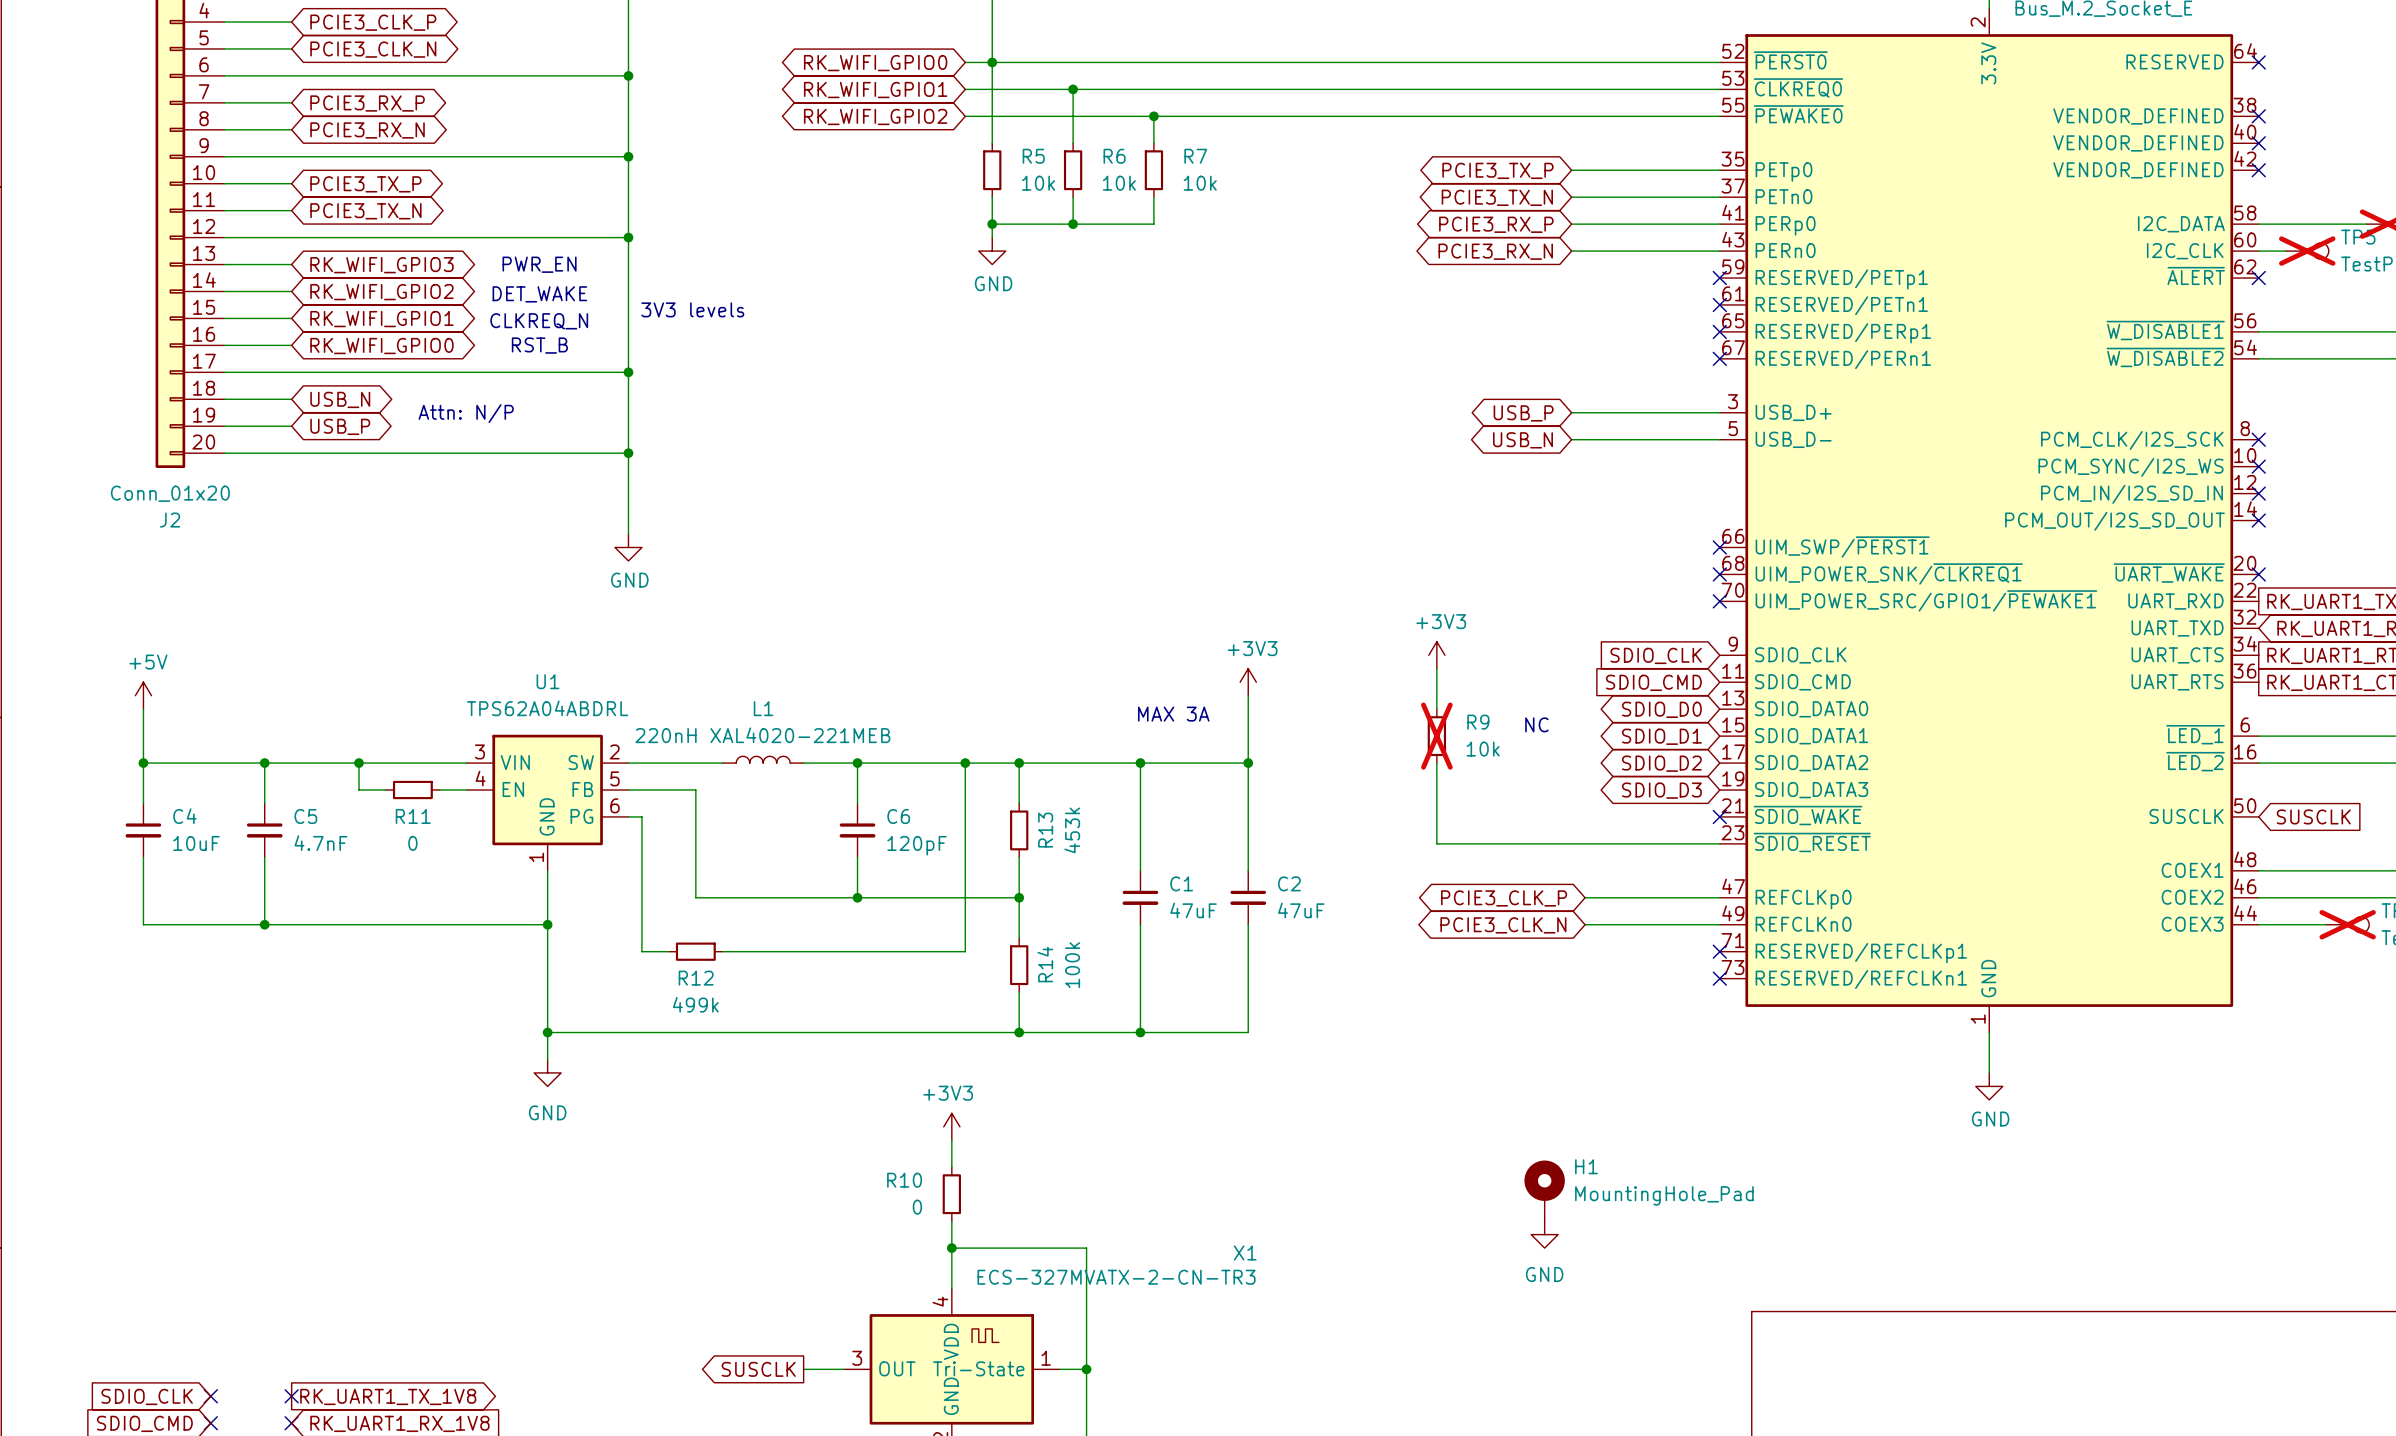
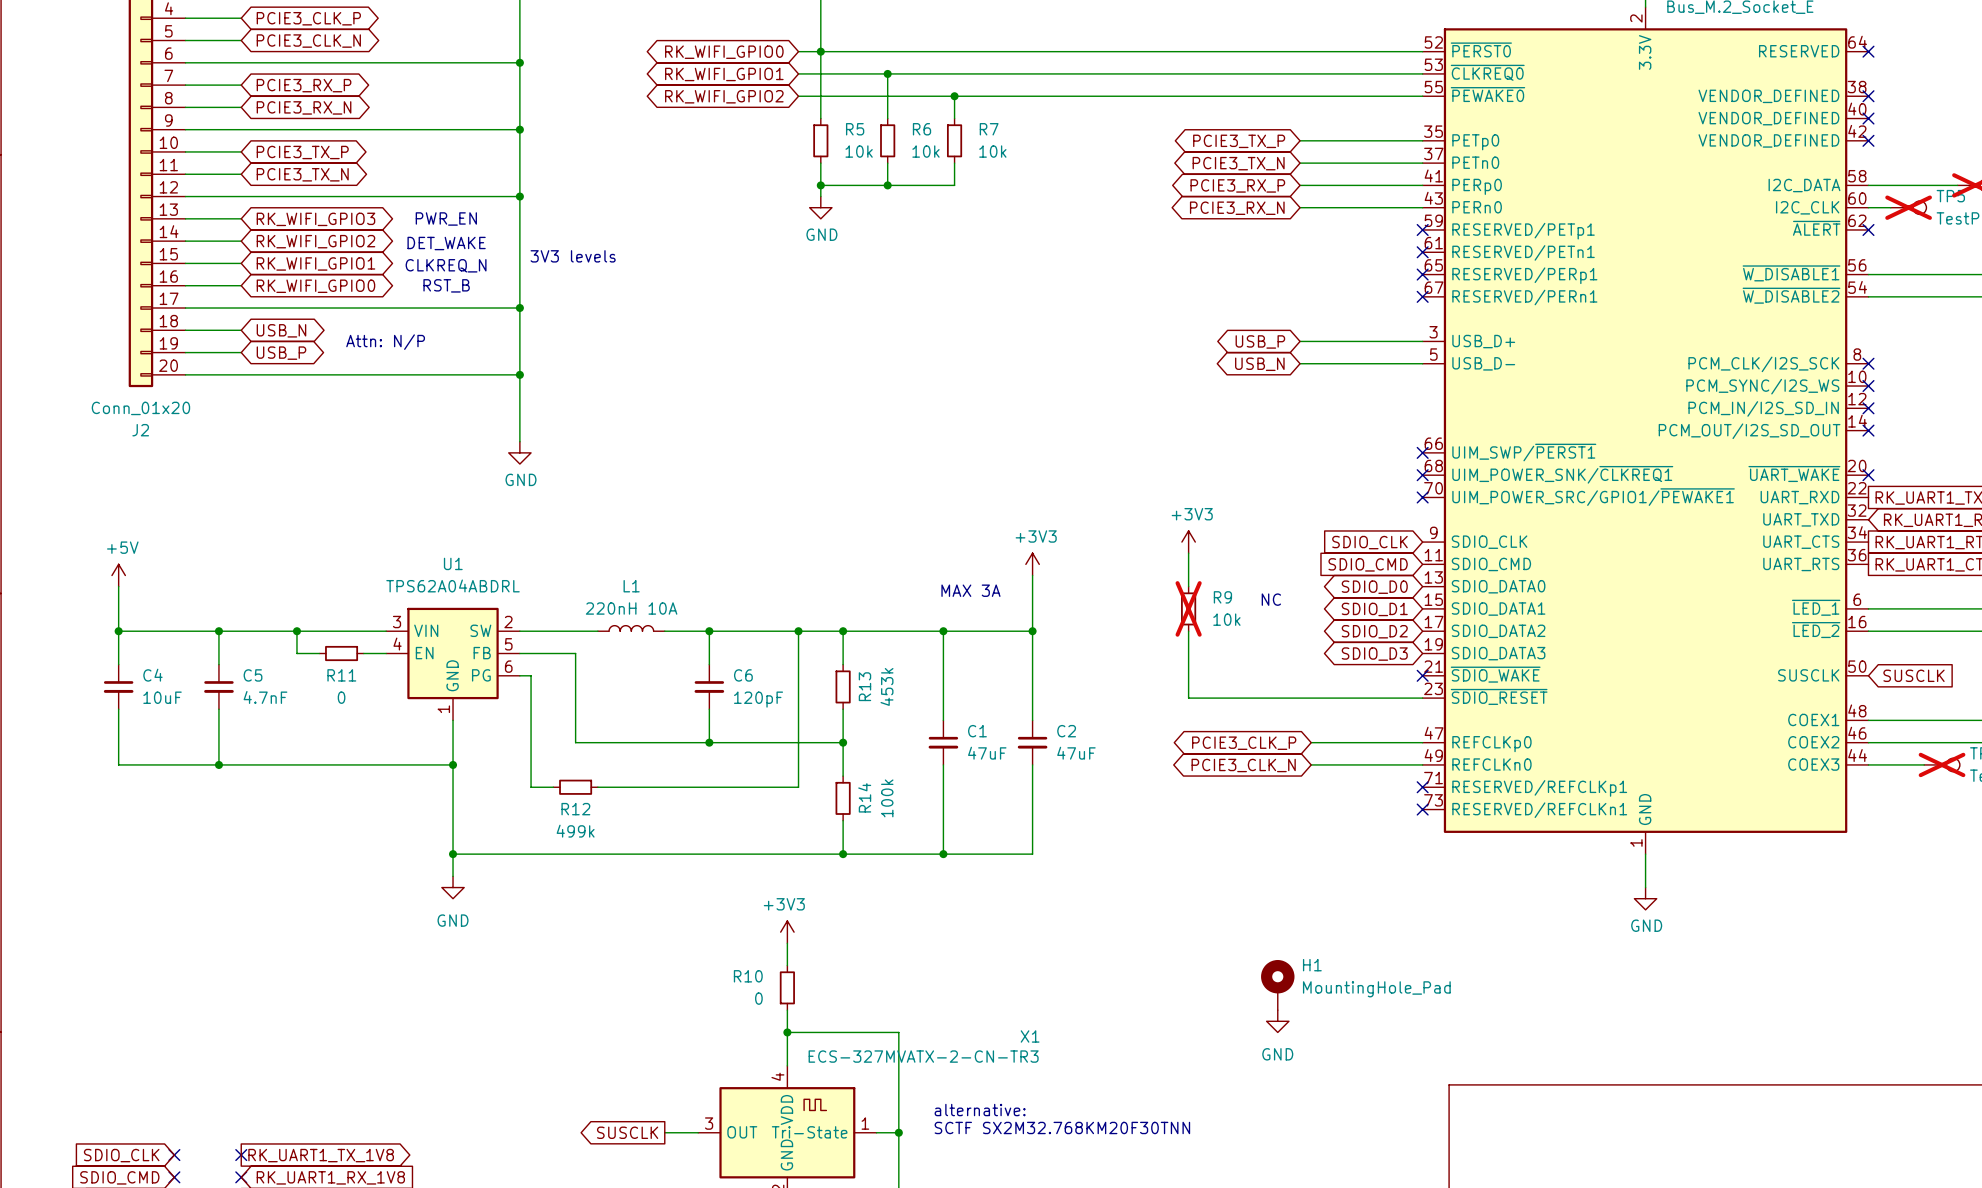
L1 value: 220nH XAL4020-221MEB (762, 735) -> 220nH 10A (631, 608)
text: none -> alternative: (980, 1110)
text: none -> SCTF SX2M32.768KM20F30TNN (1062, 1127)

